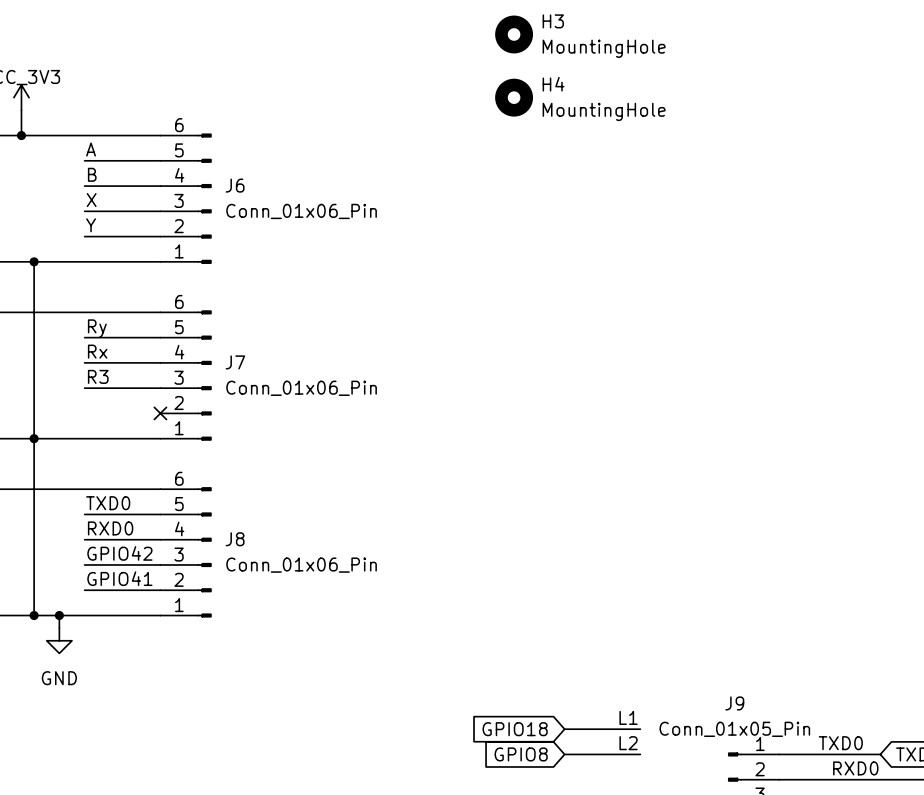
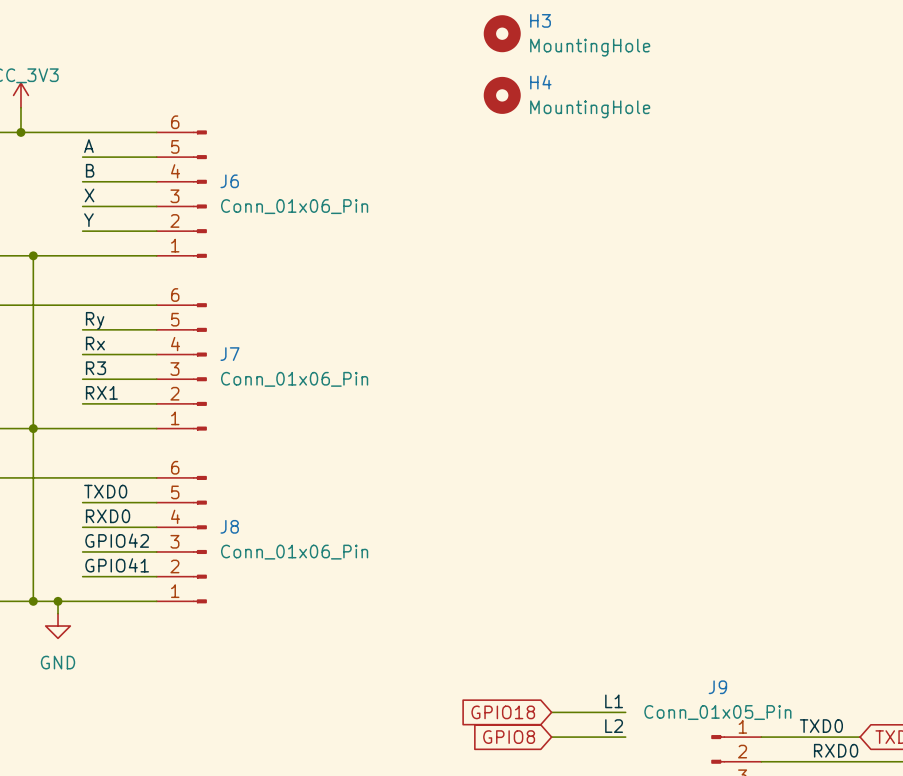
label: none -> RX1 (101, 392)
wire: none -> (82, 403) (156, 403)
no-connect mark: (160, 413) -> none

